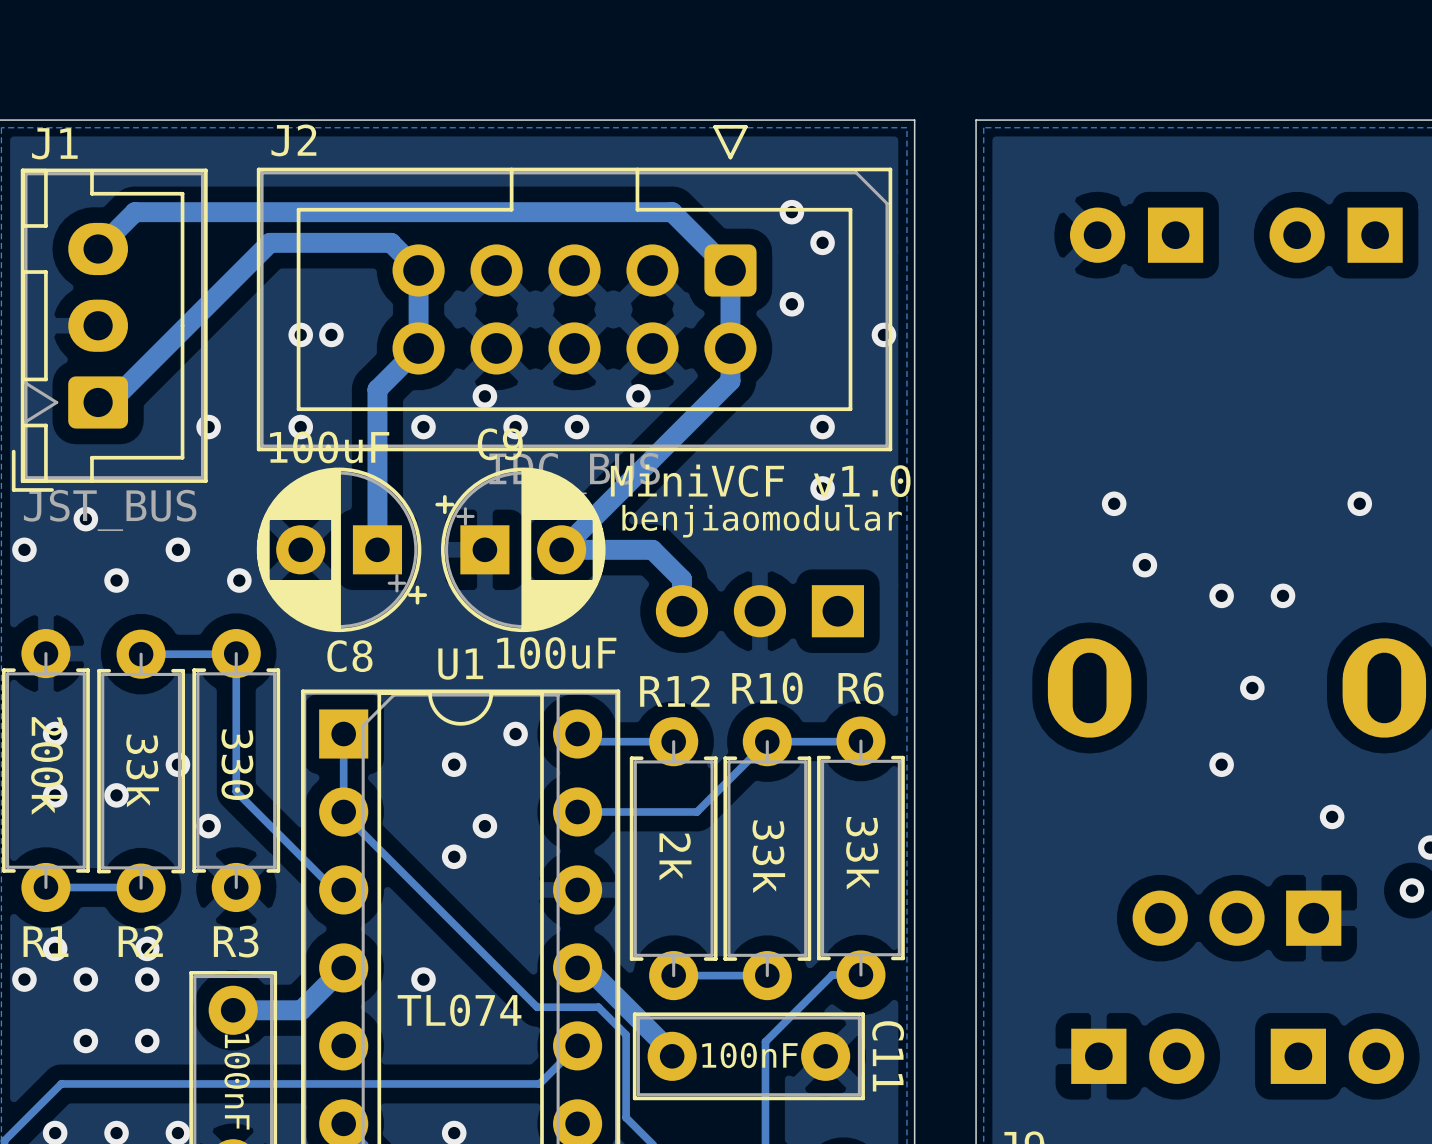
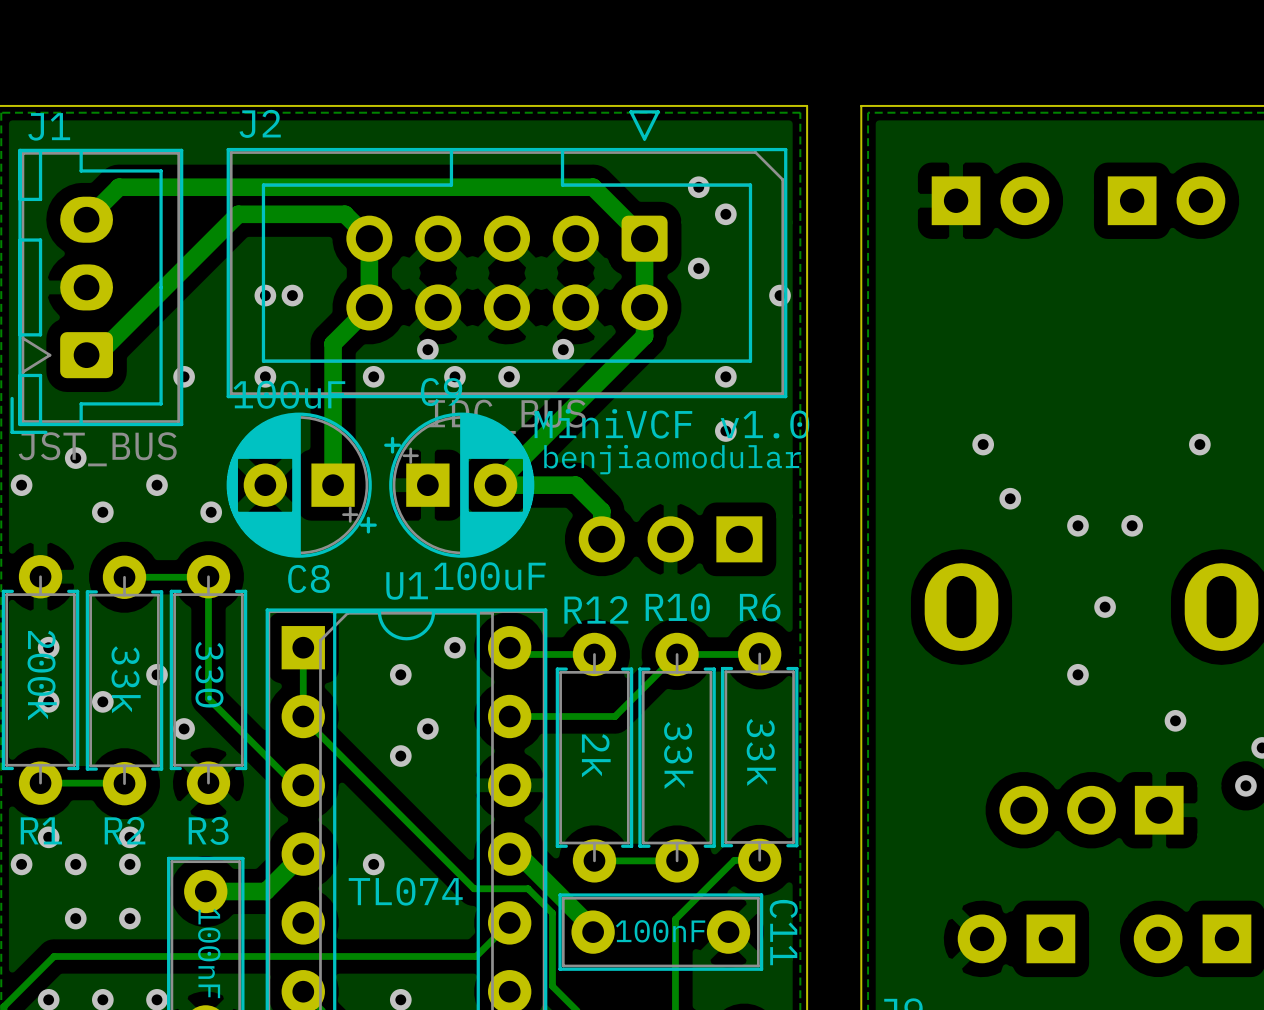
part rotation: 0° (1136, 235) -> 180° (990, 200)
part rotation: 0° (1336, 235) -> 180° (1166, 200)
part rotation: 0° (1137, 1056) -> 180° (1016, 938)
part rotation: 0° (1337, 1056) -> 180° (1192, 938)

